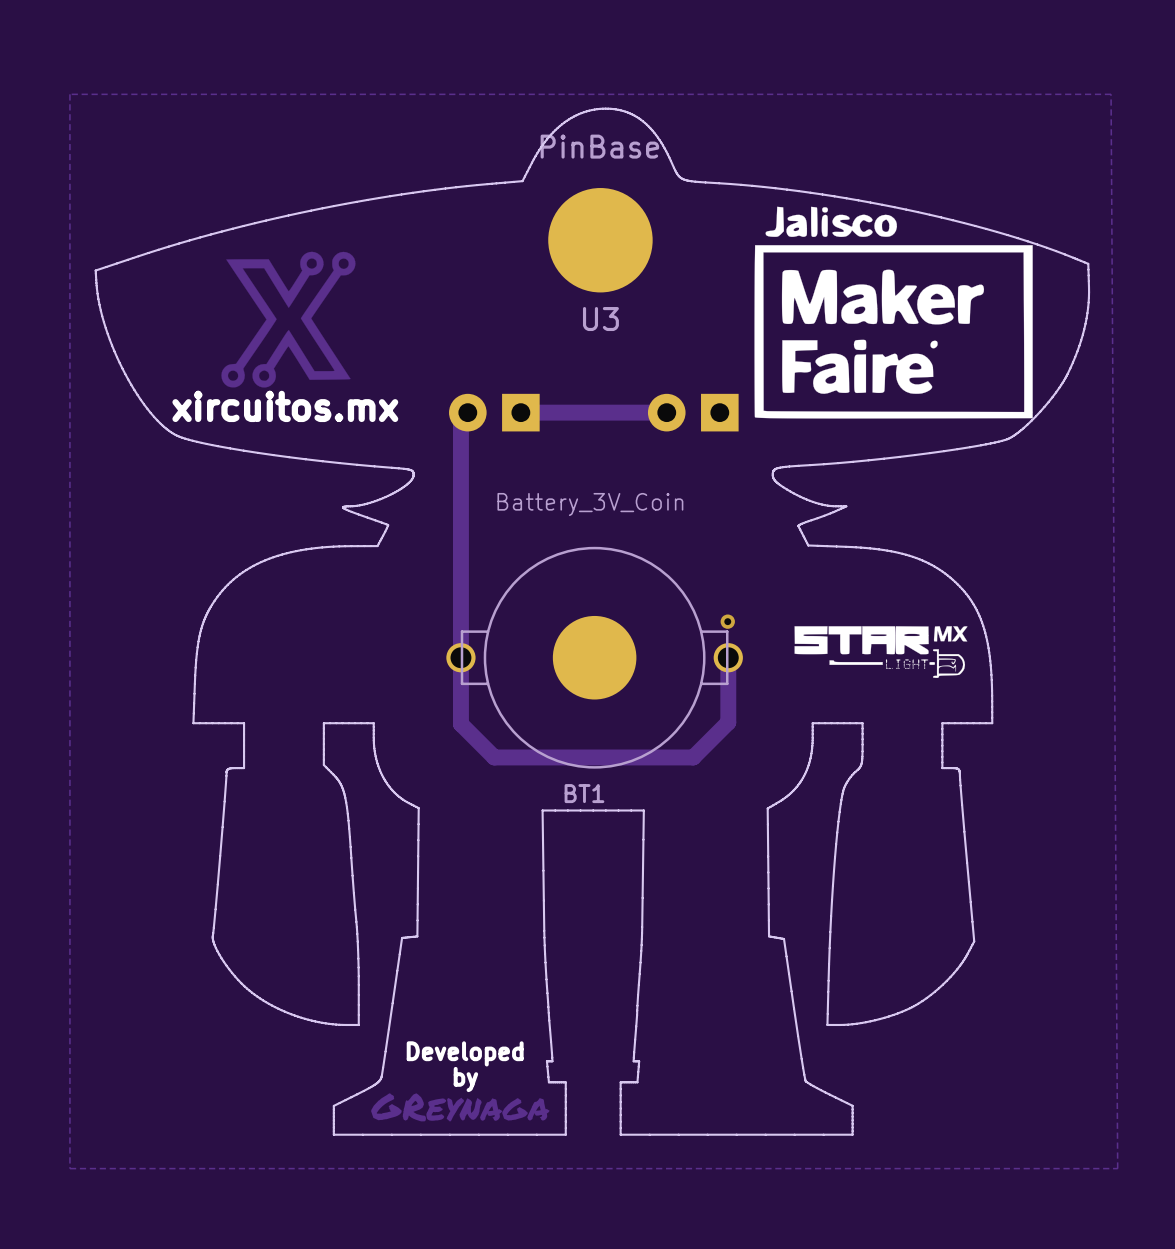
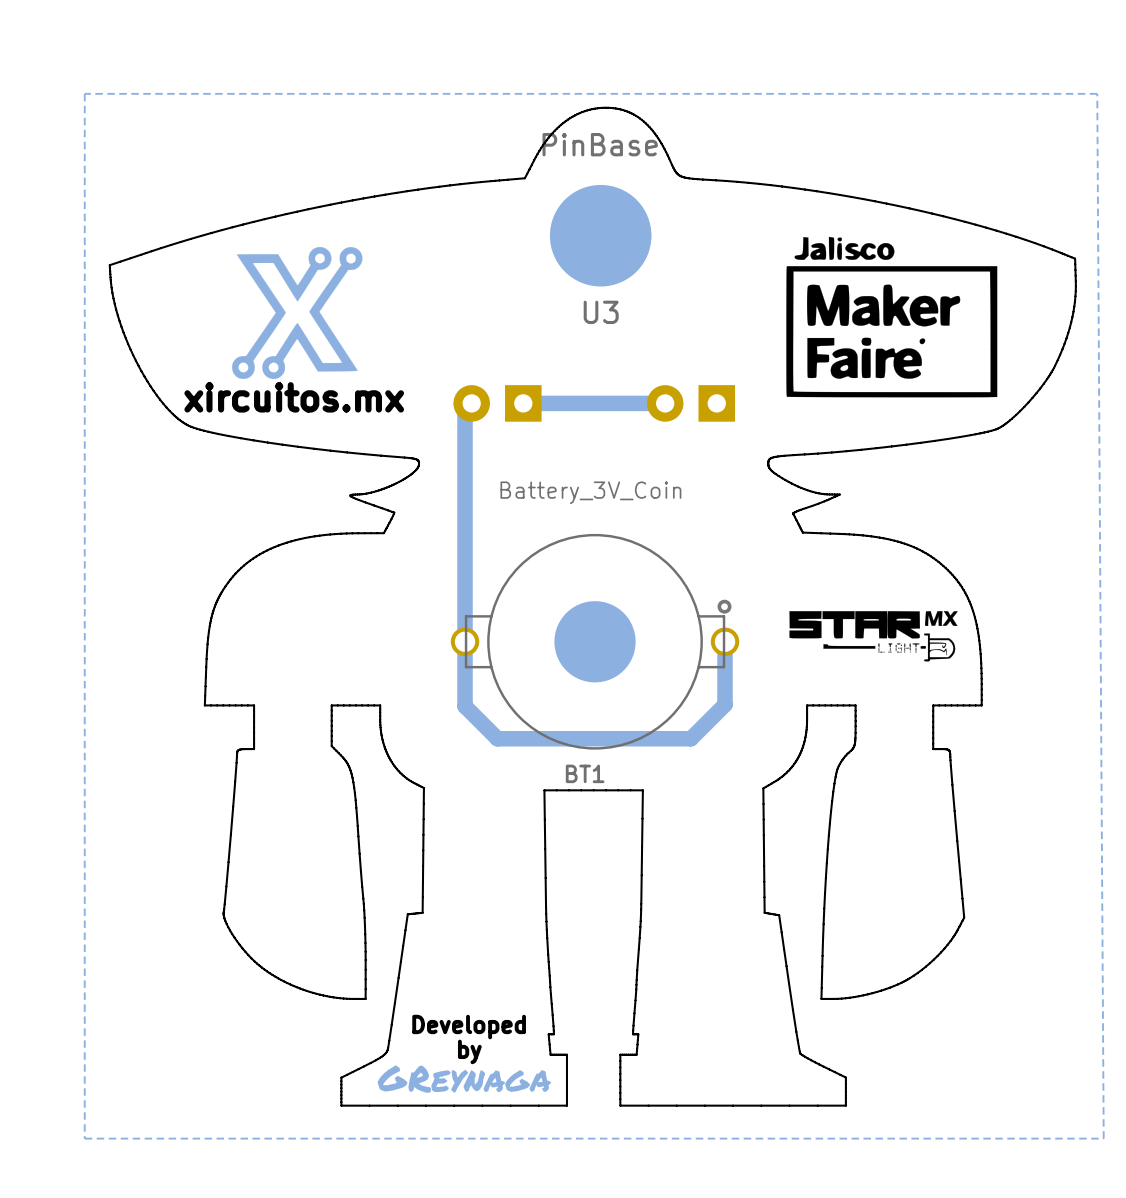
drawing shape: [754, 206, 1033, 419] -> [786, 236, 998, 398]

